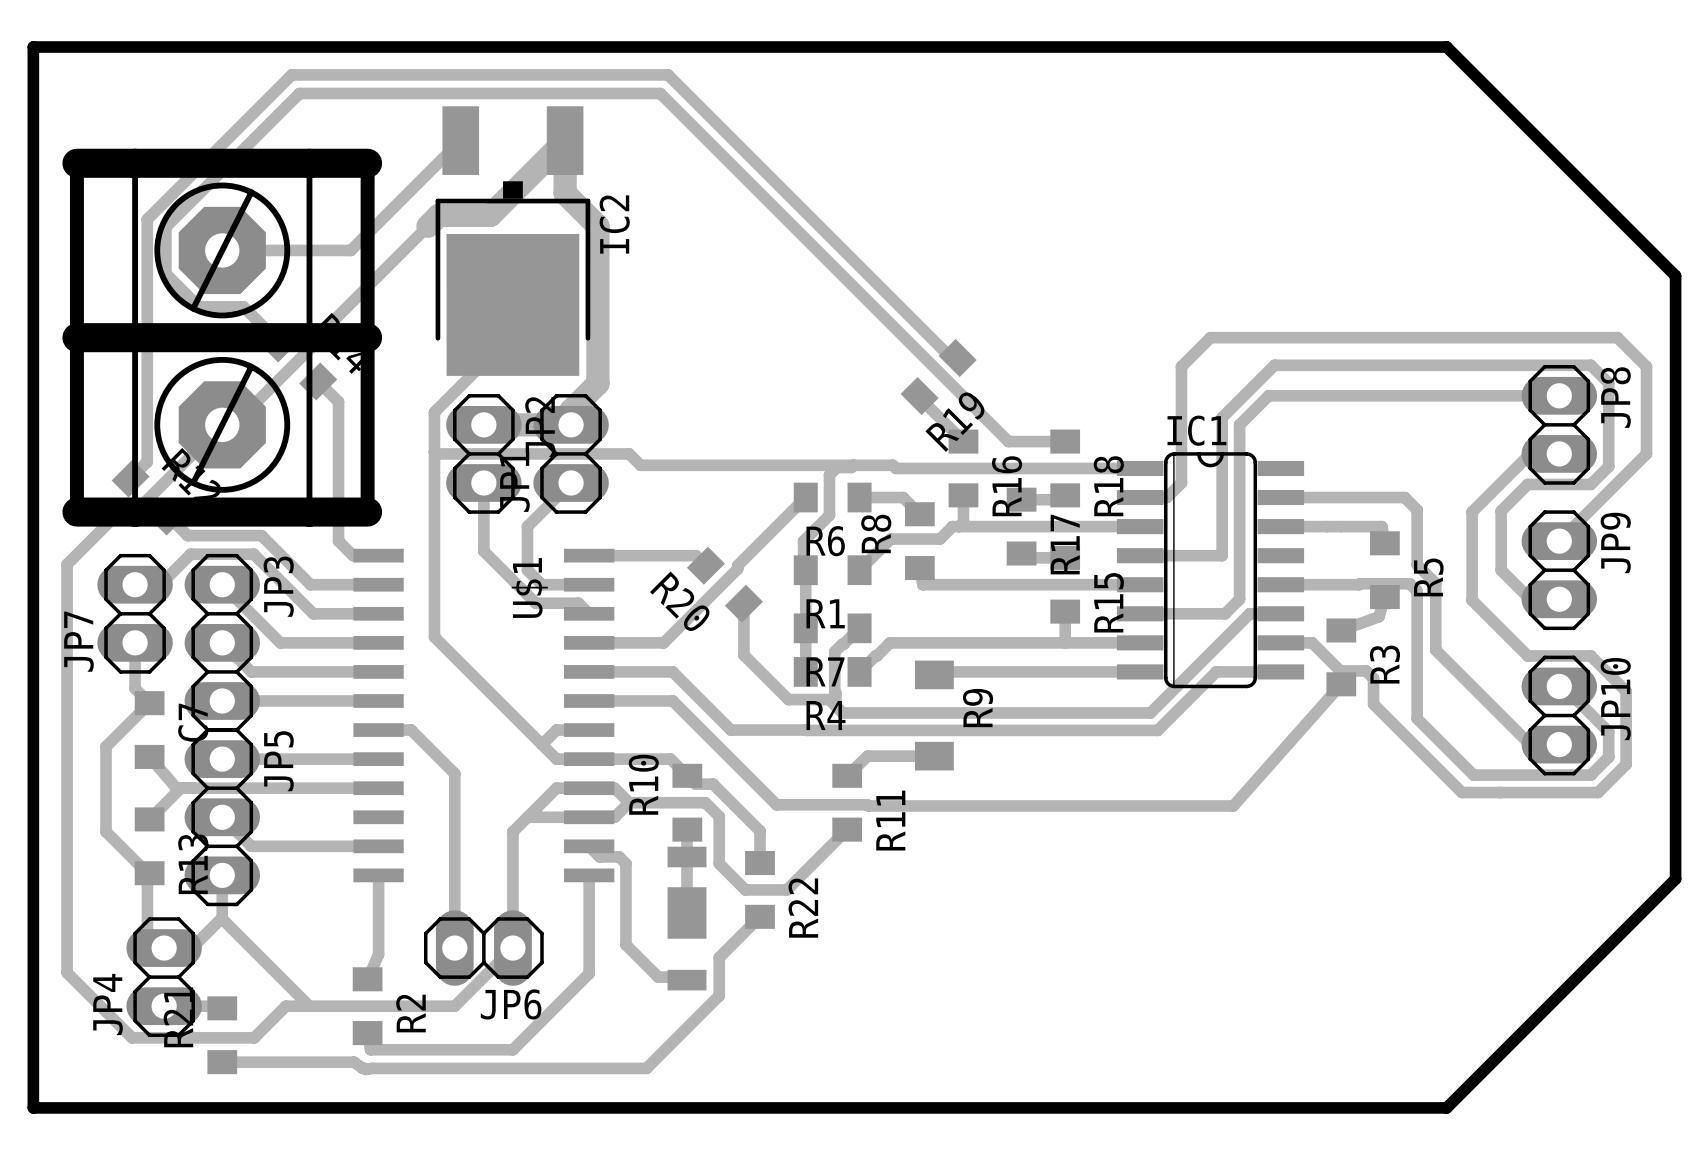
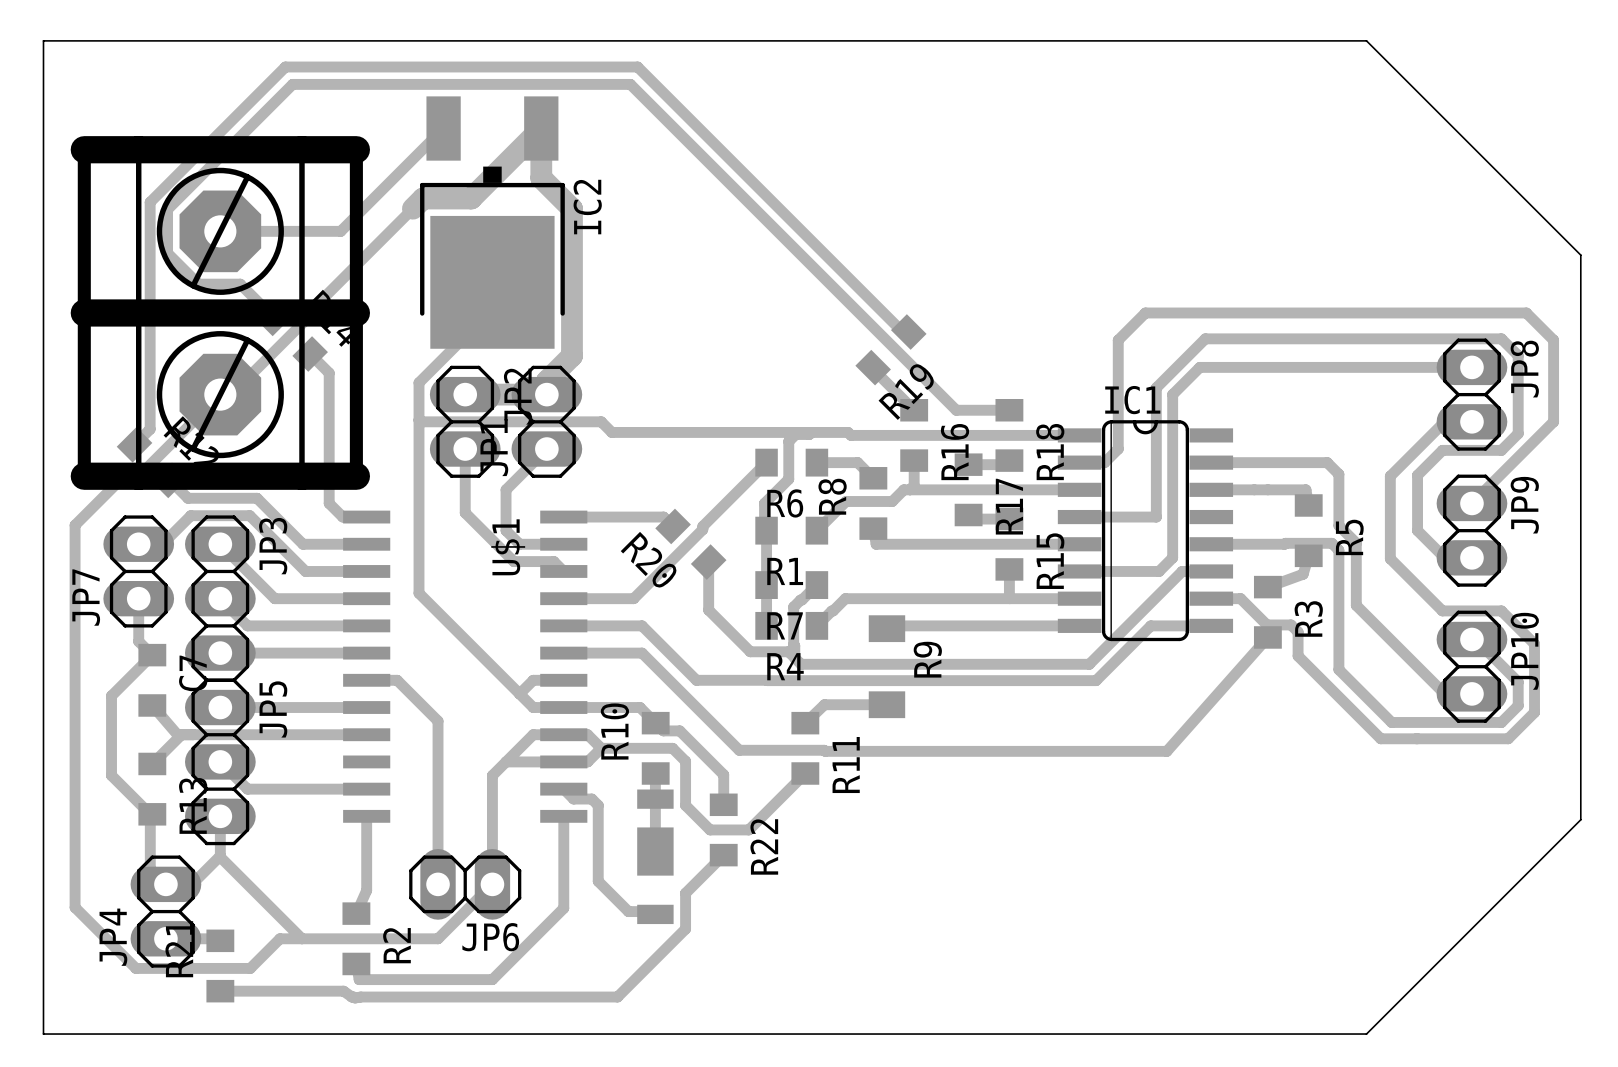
board edge width: thick (33, 47) (1446, 47) (1675, 275) (1675, 879) (1446, 1107) (33, 1107) (33, 47) -> thin (43, 40) (1366, 40) (1580, 255) (1580, 819) (1366, 1034) (43, 1034) (43, 40)

